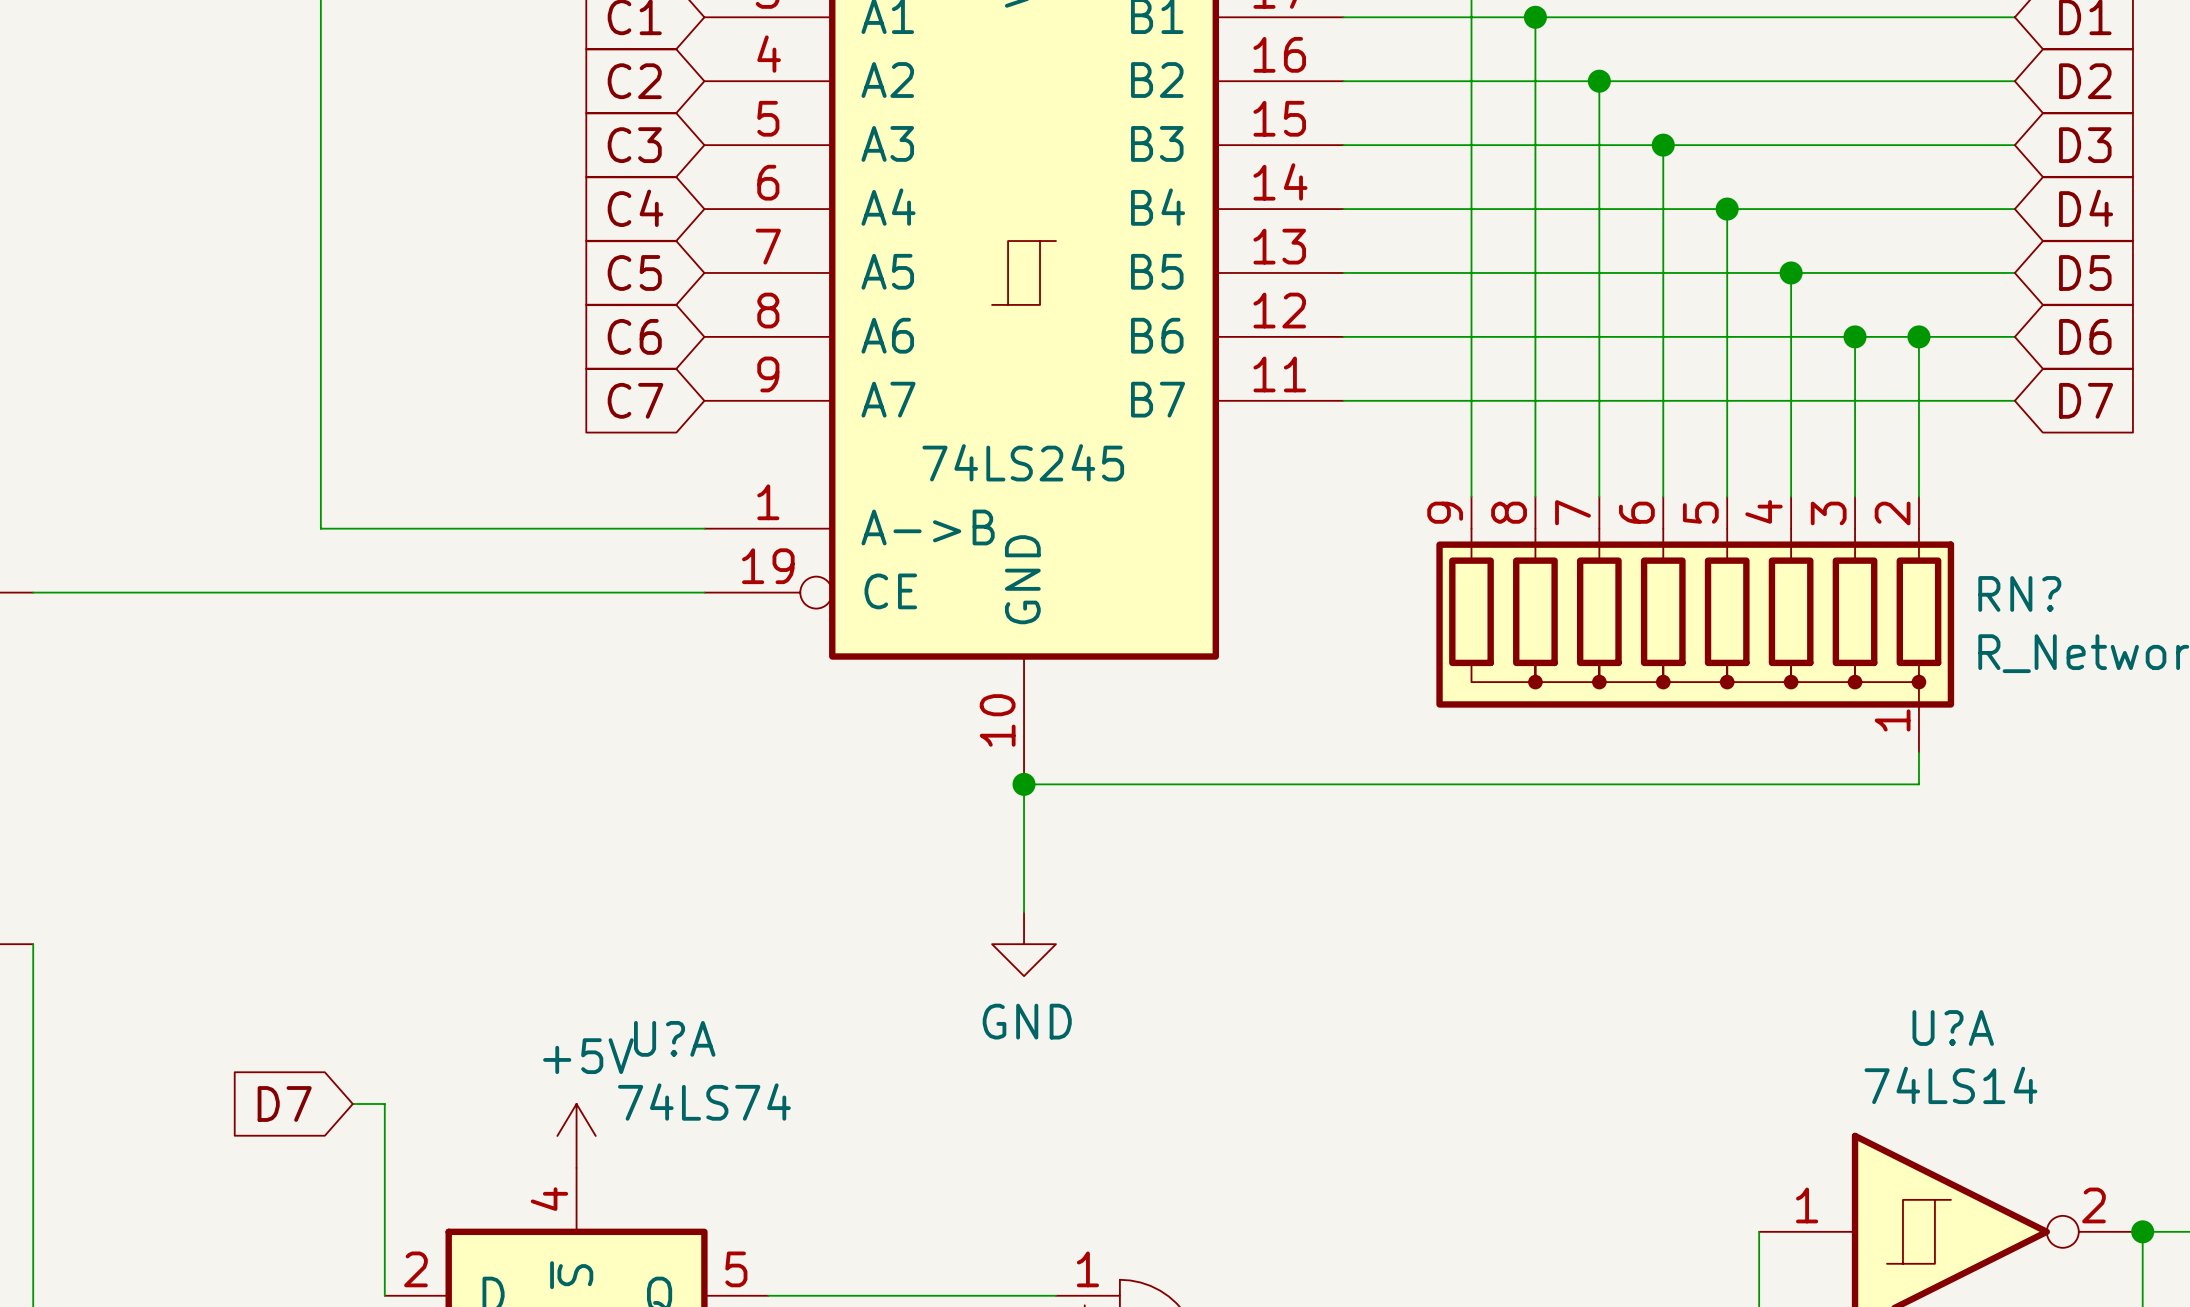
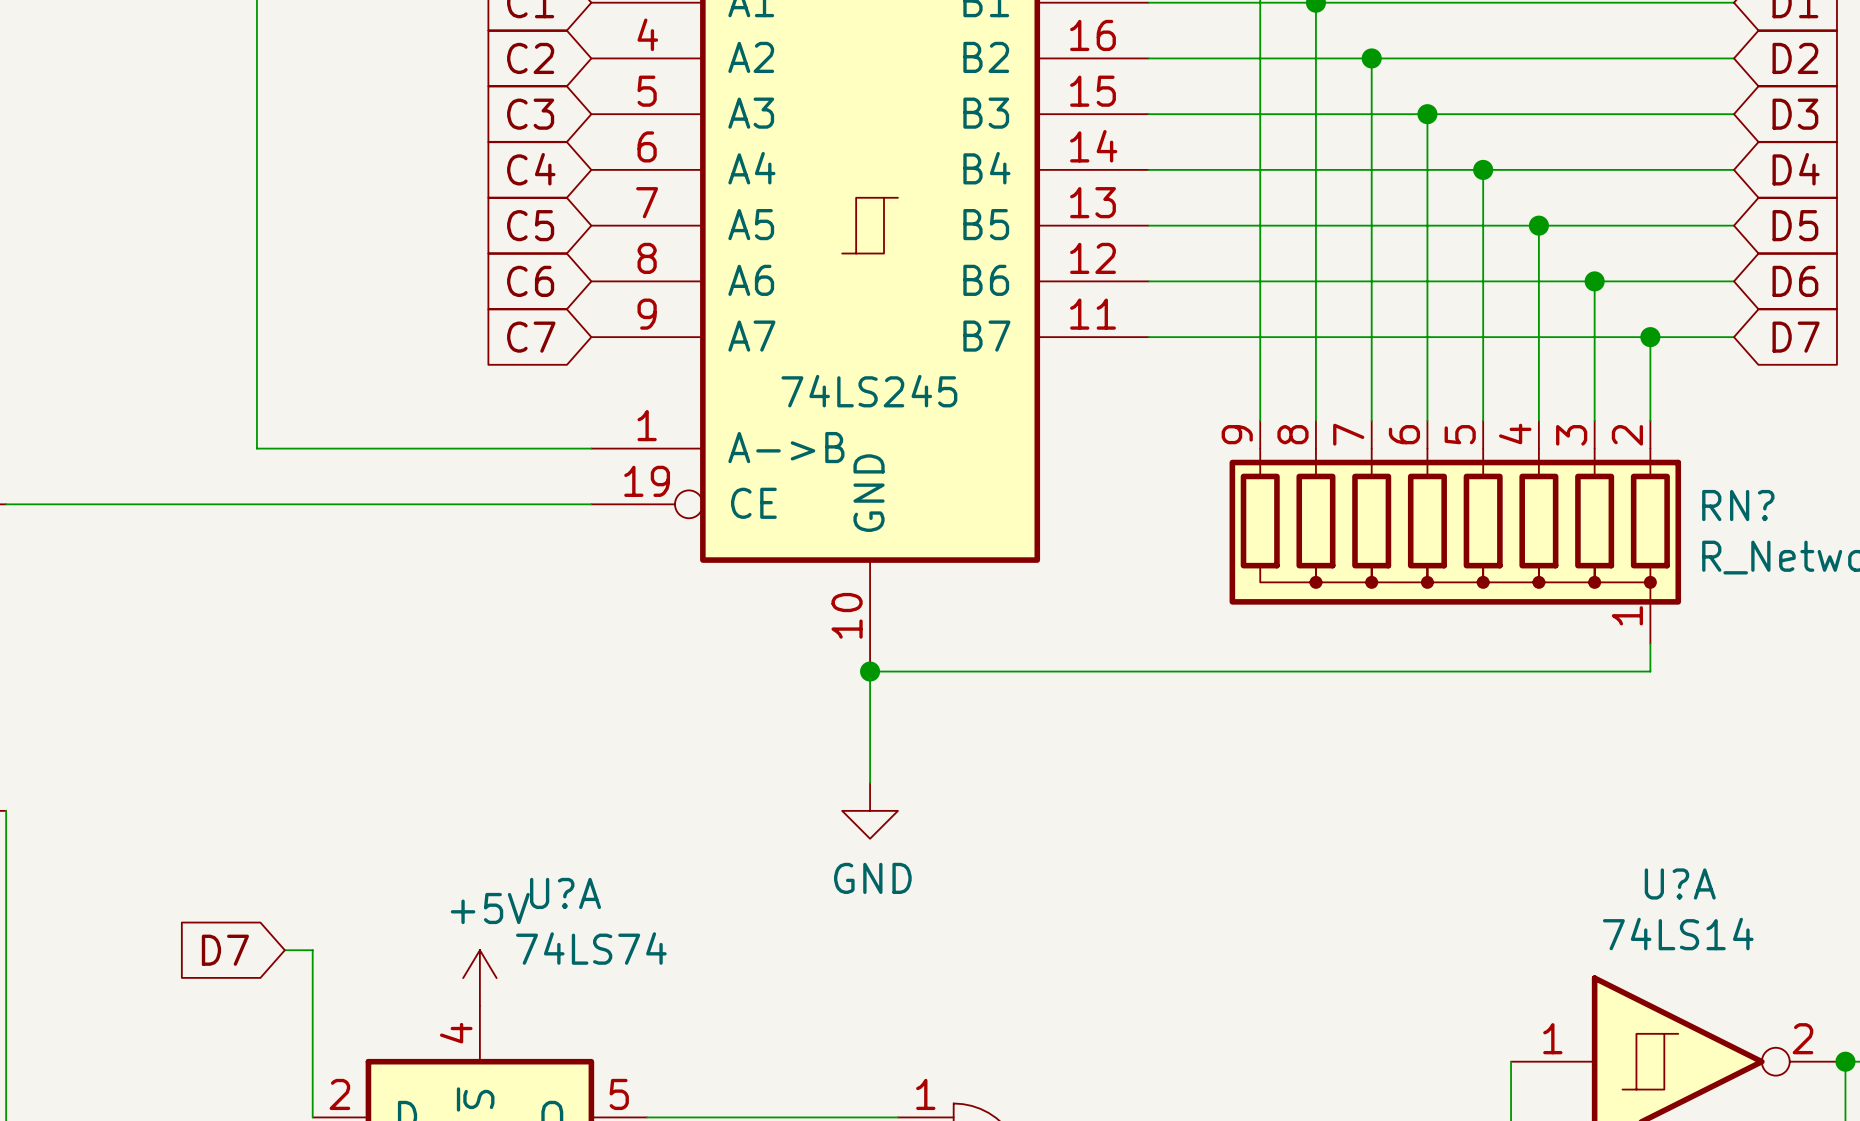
wire: (1918, 336) (1918, 400) -> none
junction position: (1918, 336) -> (1650, 337)

